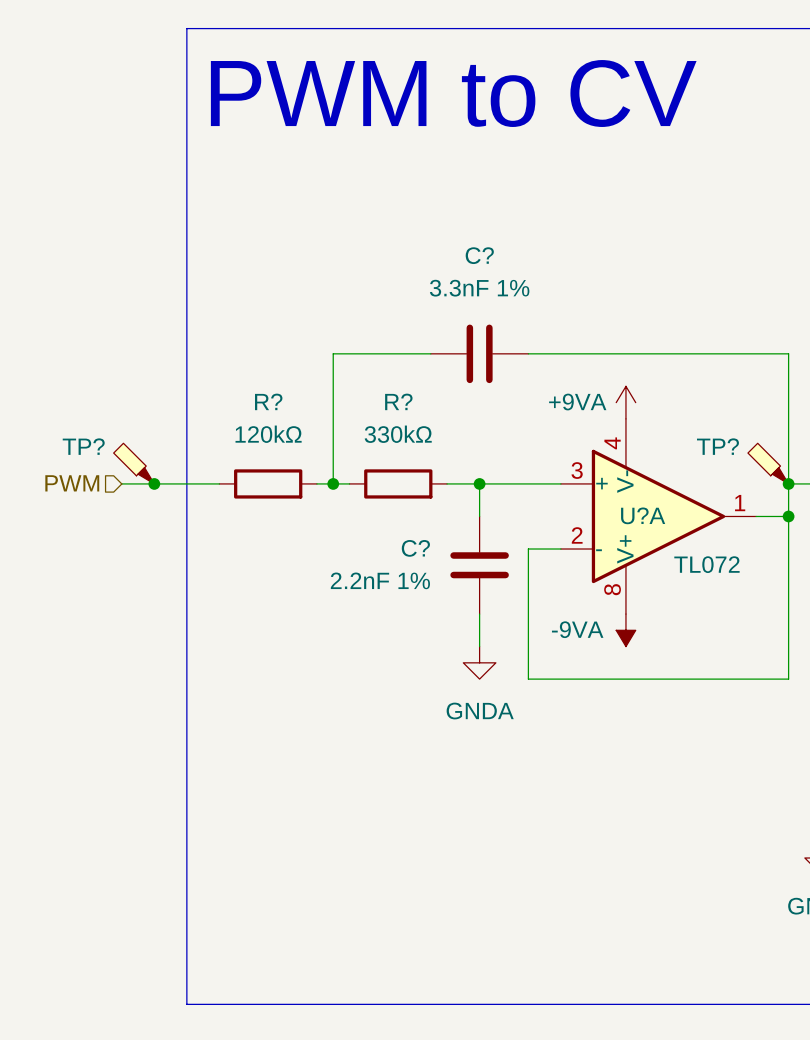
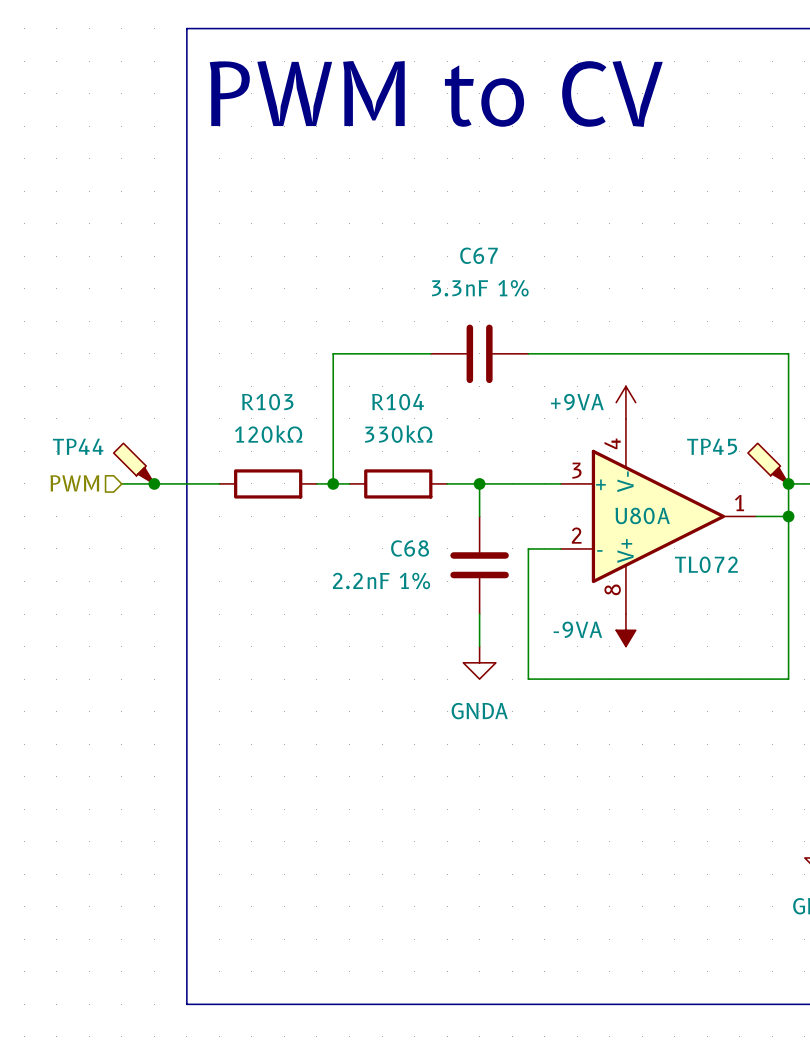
C? name: C? (479, 255) -> C67 (479, 255)
R? name: R? (268, 401) -> R103 (267, 402)
R? name: R? (398, 401) -> R104 (398, 402)
TP? name: TP? (83, 446) -> TP44 (78, 446)
TP? name: TP? (717, 446) -> TP45 (712, 446)
U?A name: U?A (643, 515) -> U80A (642, 515)
C? name: C? (415, 548) -> C68 (410, 548)

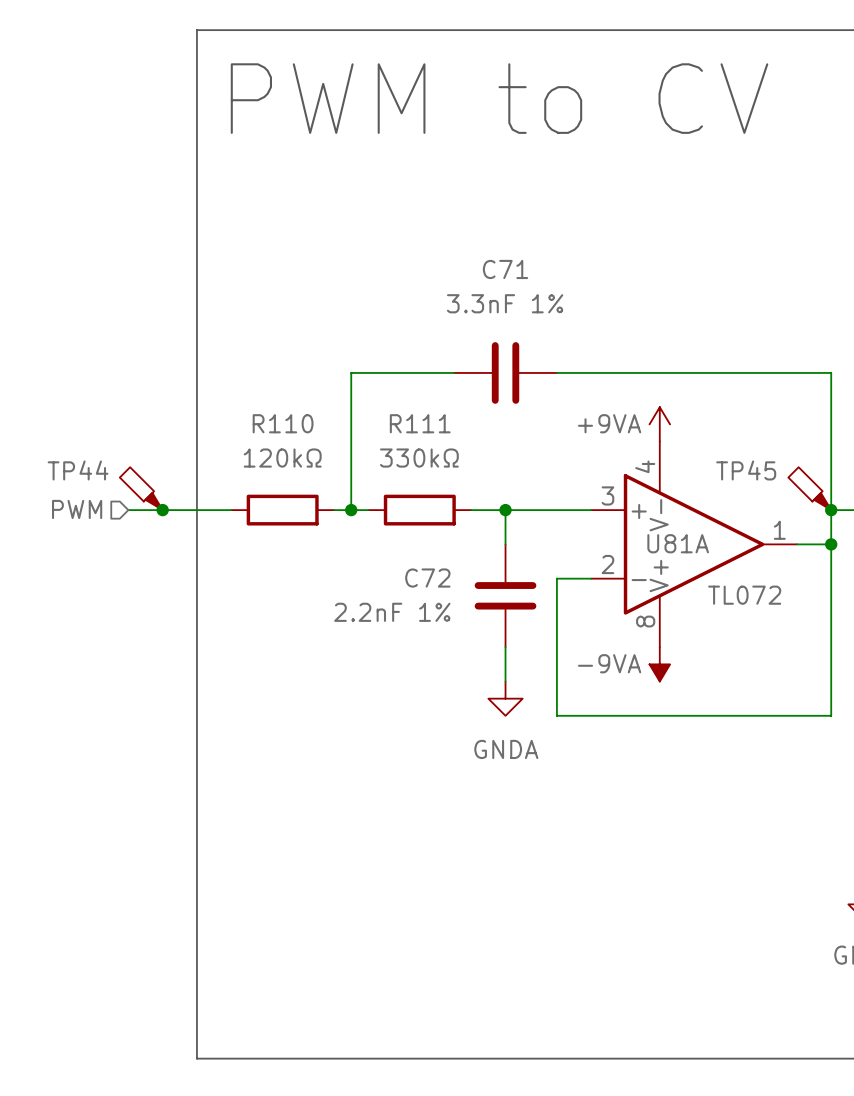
C67 name: C67 (479, 255) -> C71 (505, 269)
R103 name: R103 (267, 402) -> R110 (283, 423)
R104 name: R104 (398, 402) -> R111 (420, 423)
U80A name: U80A (642, 515) -> U81A (678, 543)
C68 name: C68 (410, 548) -> C72 (427, 578)

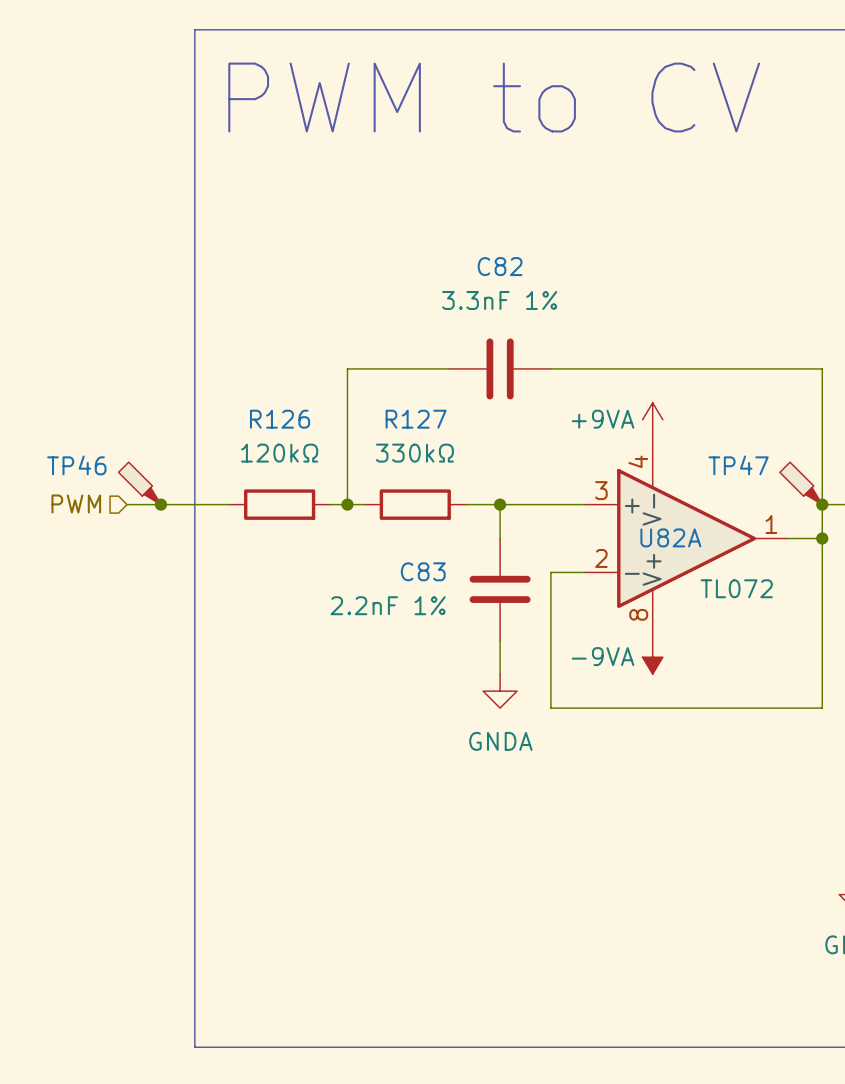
C71 name: C71 (505, 269) -> C82 (500, 266)
R110 name: R110 (283, 423) -> R126 (280, 419)
R111 name: R111 (420, 423) -> R127 (416, 419)
TP44 name: TP44 (78, 470) -> TP46 (76, 465)
TP45 name: TP45 (746, 470) -> TP47 (738, 465)
U81A name: U81A (678, 543) -> U82A (670, 537)
C72 name: C72 (427, 578) -> C83 (423, 571)

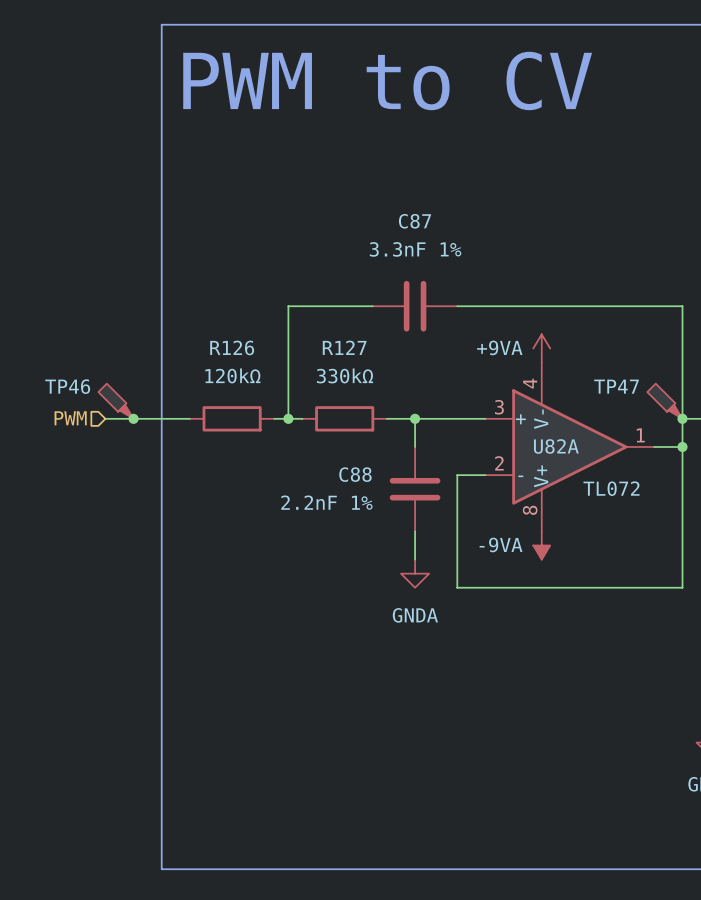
C82 name: C82 (500, 266) -> C87 (415, 221)
C83 name: C83 (423, 571) -> C88 (355, 474)

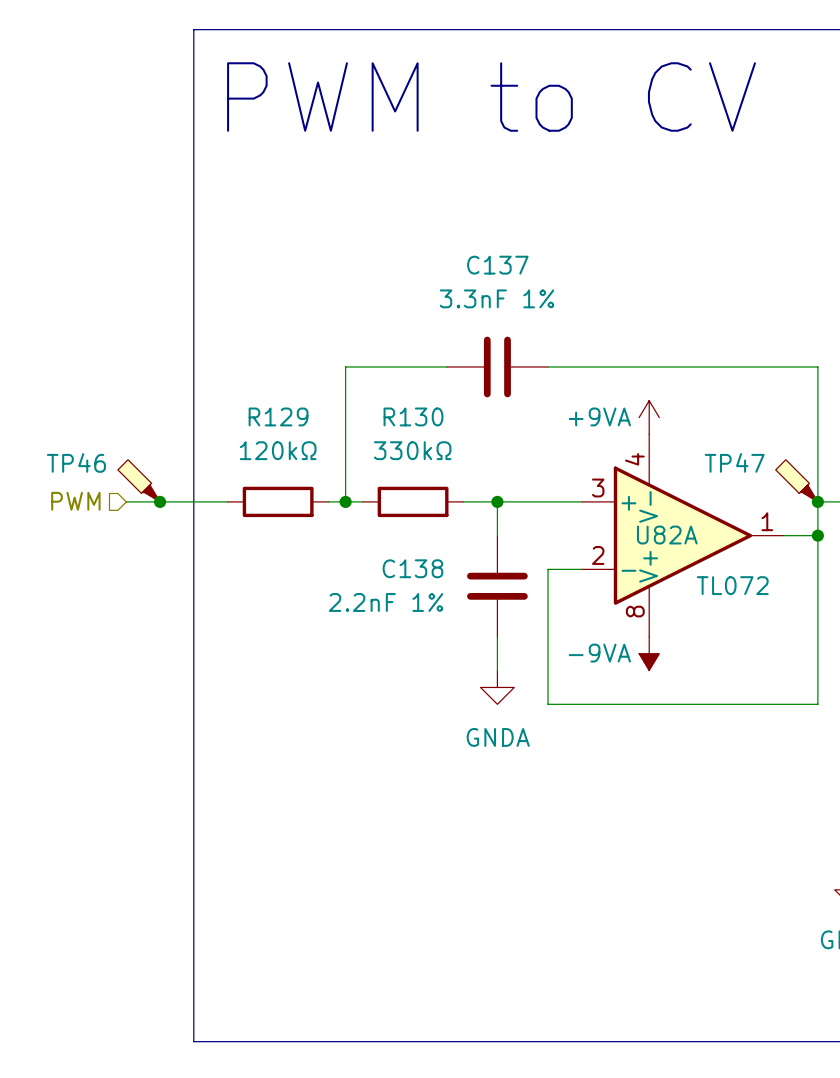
C87 name: C87 (415, 221) -> C137 (497, 265)
R126 name: R126 (232, 347) -> R129 (278, 416)
R127 name: R127 (344, 347) -> R130 (413, 416)
C88 name: C88 (355, 474) -> C138 (412, 568)

